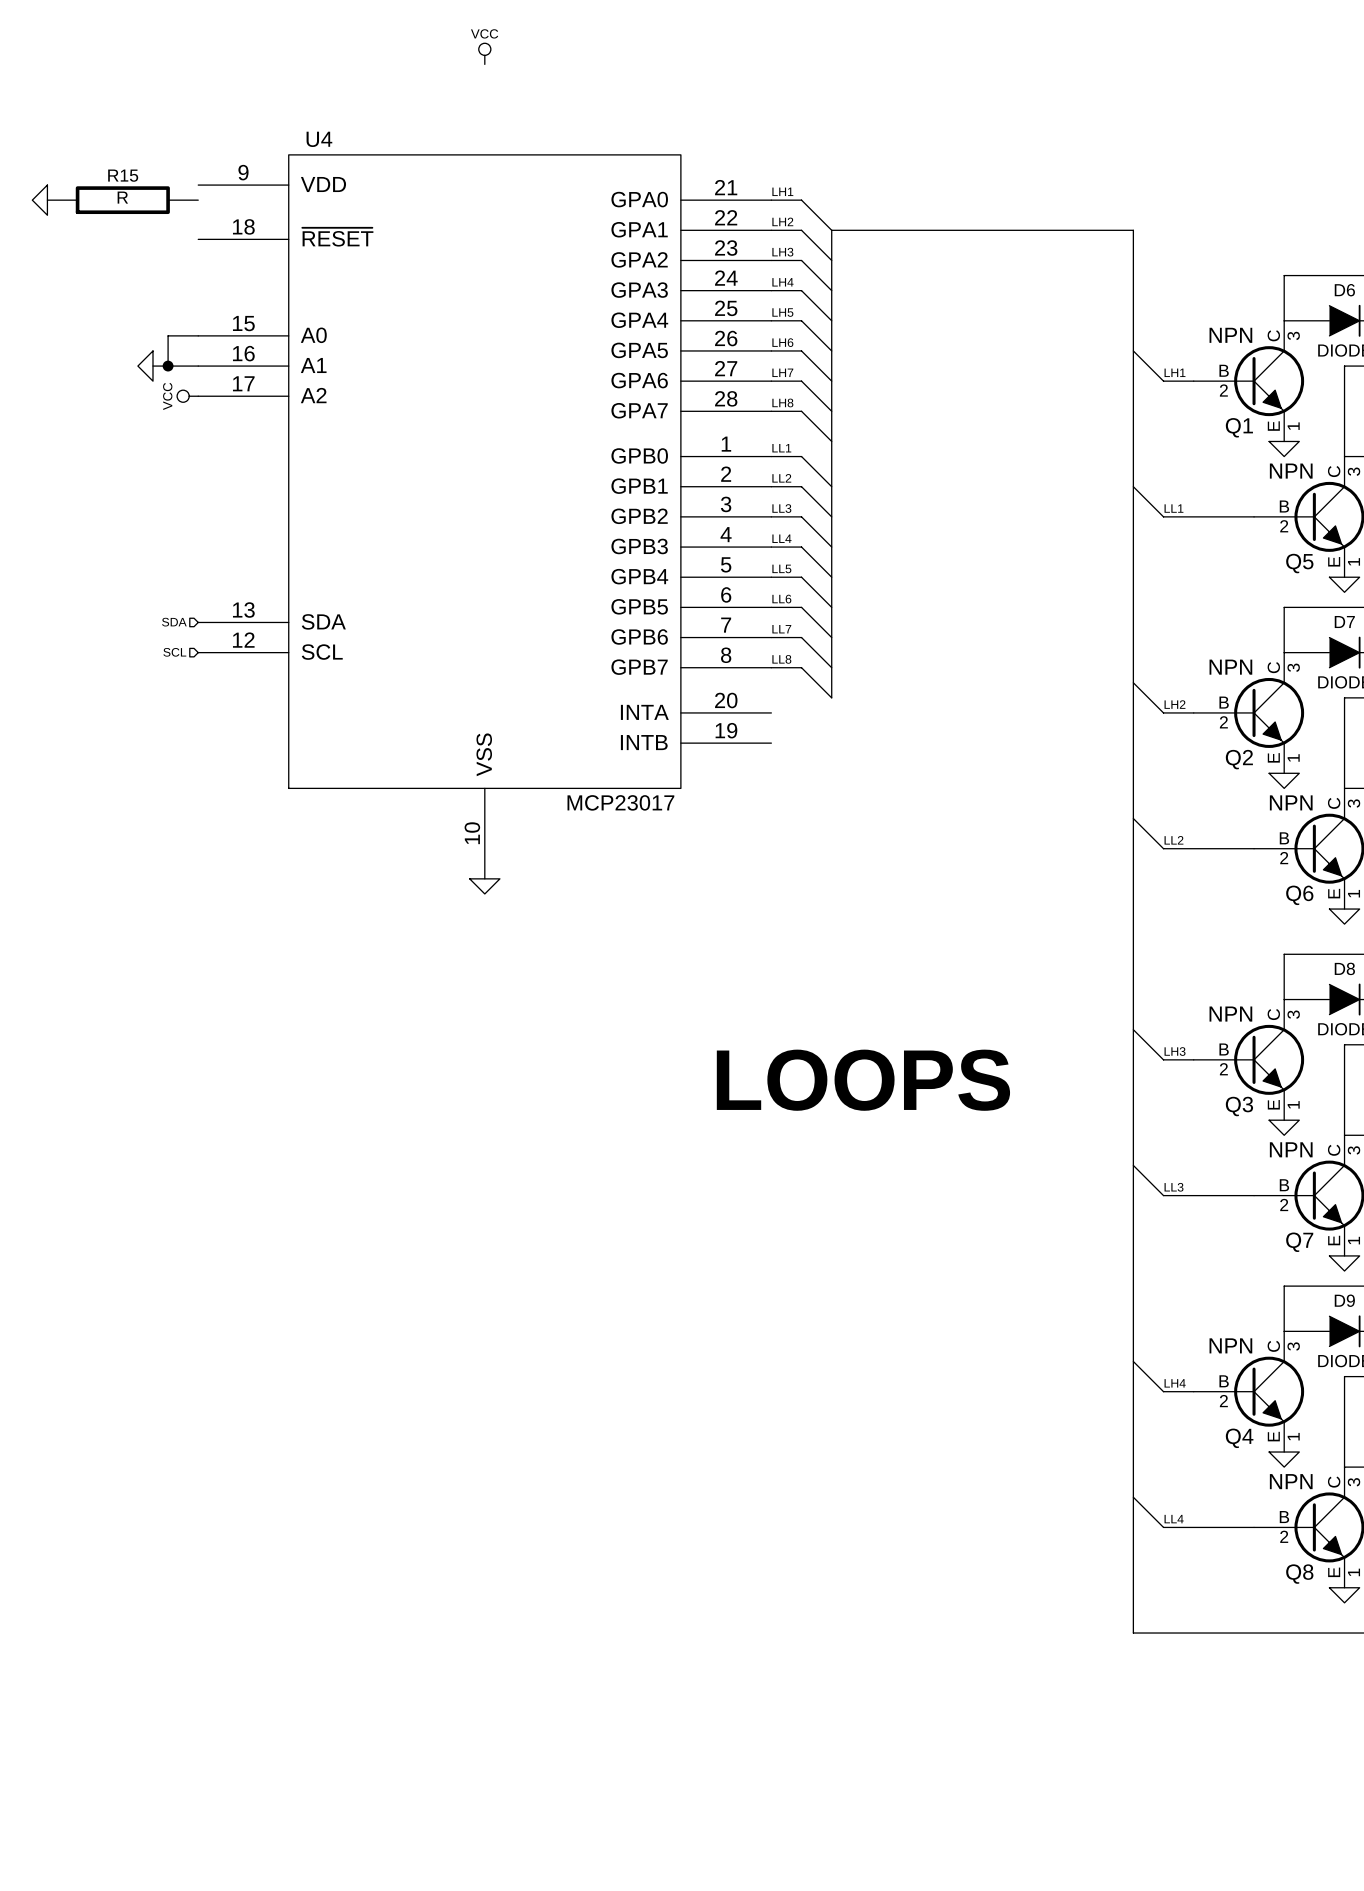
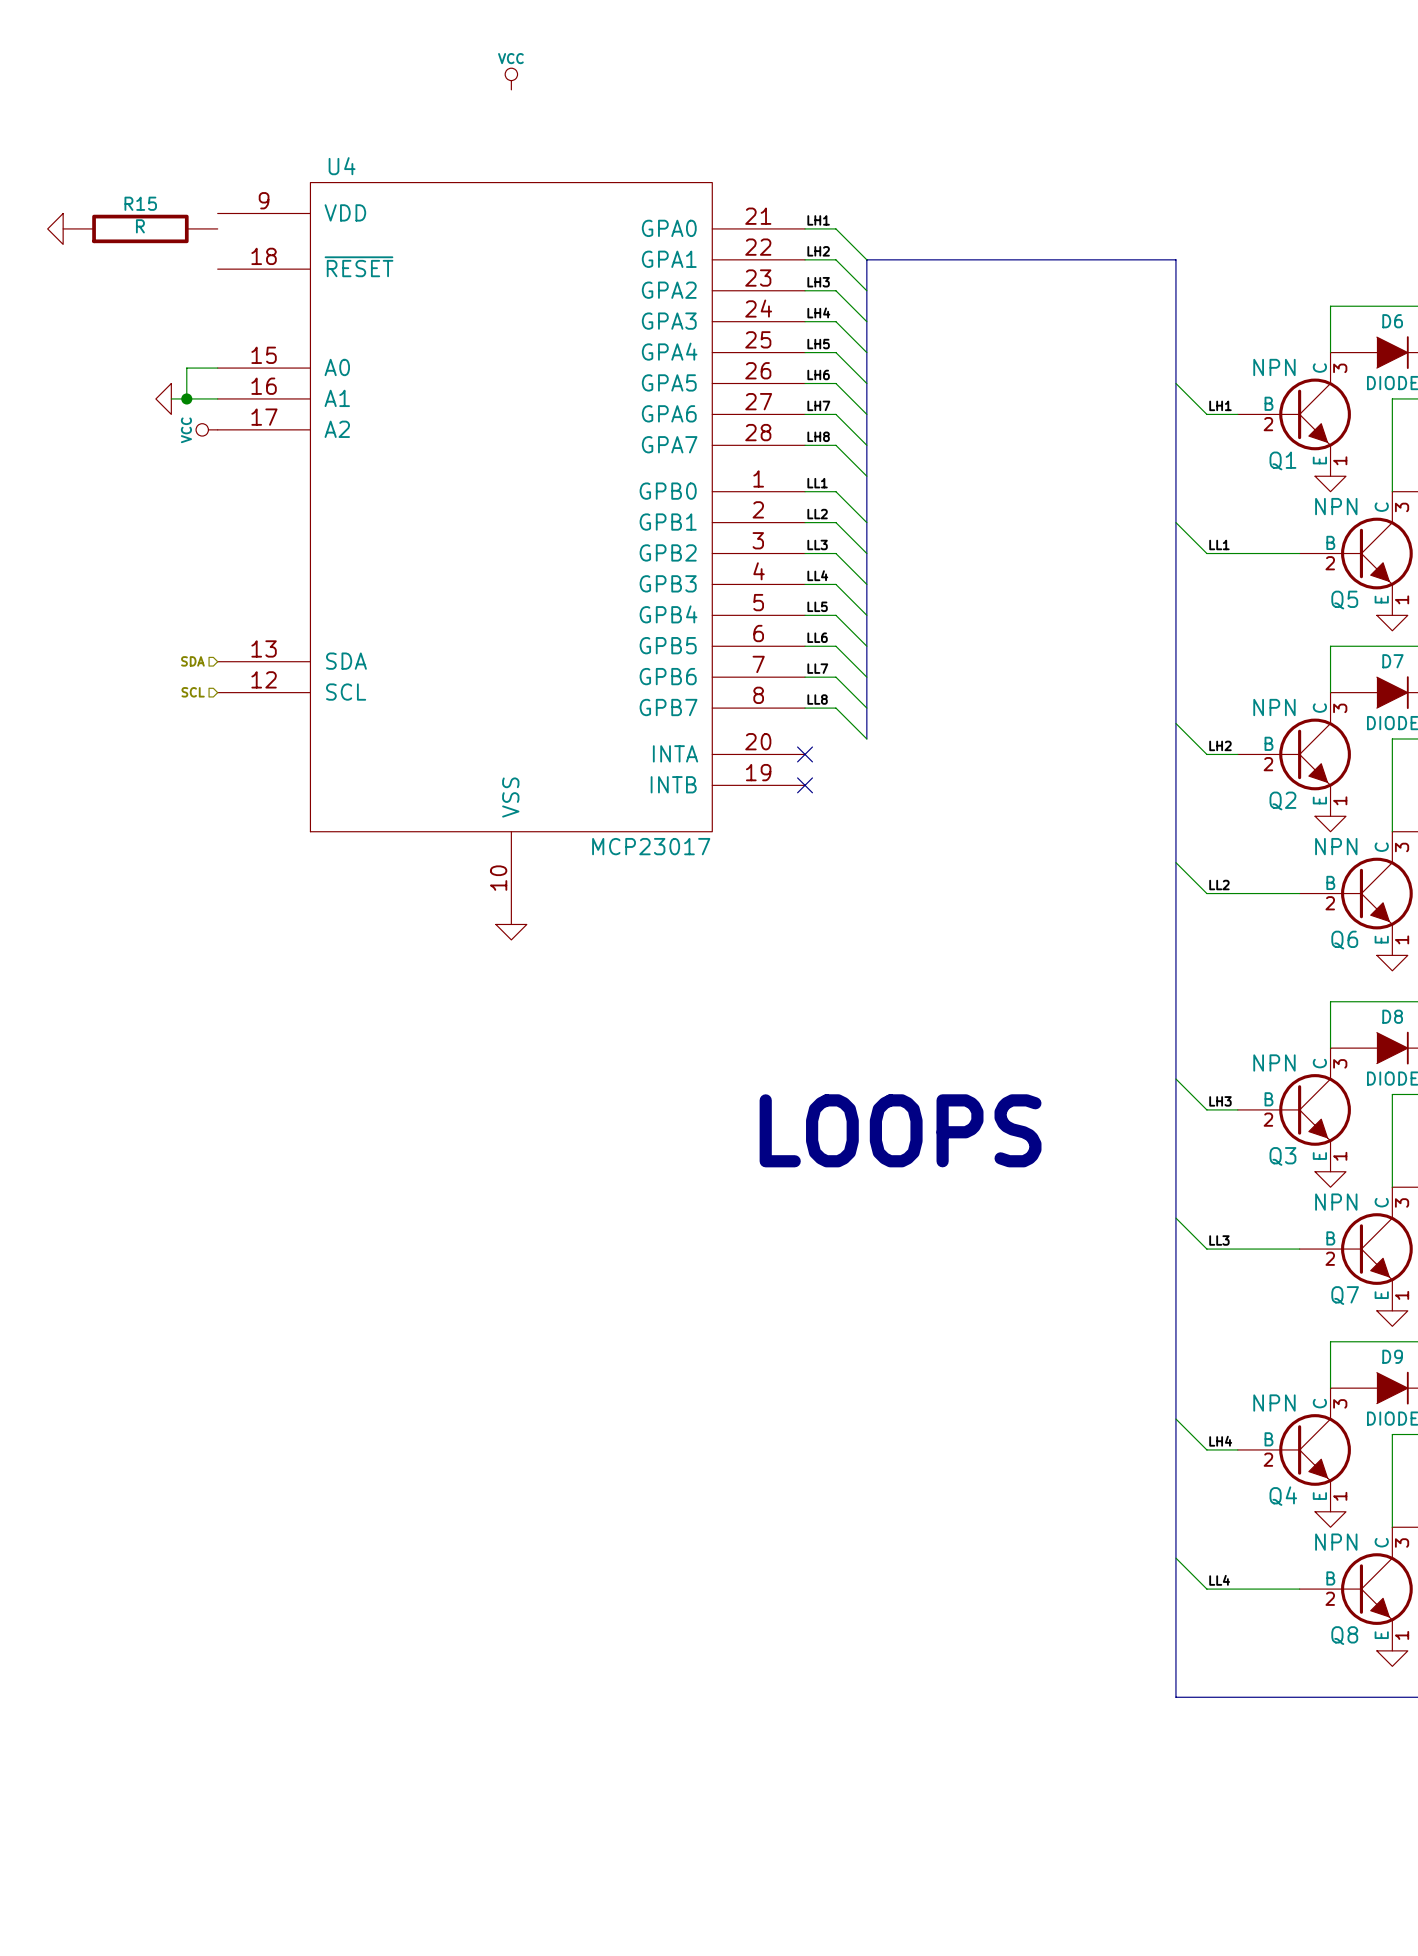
no-connect mark: none -> (805, 754)
no-connect mark: none -> (805, 785)

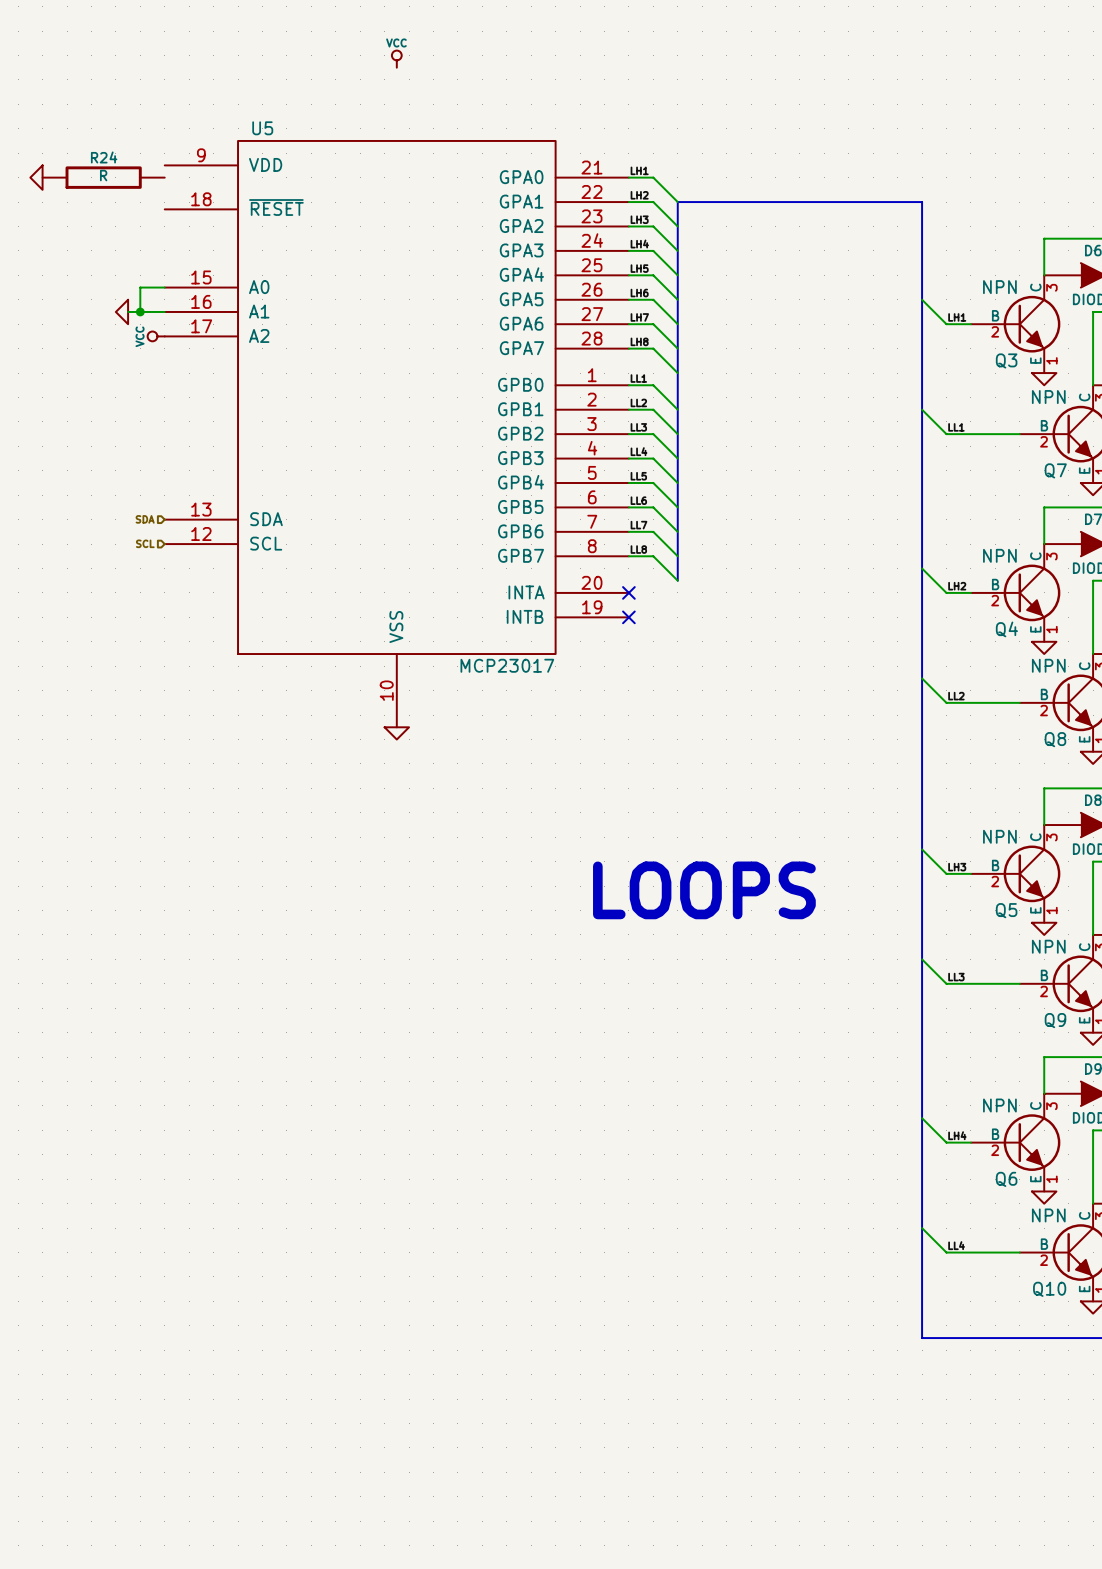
U4 name: U4 (342, 166) -> U5 (262, 128)
R15 name: R15 (140, 203) -> R24 (104, 157)
Q1 name: Q1 (1282, 460) -> Q3 (1006, 360)
Q5 name: Q5 (1344, 600) -> Q7 (1055, 470)
Q2 name: Q2 (1282, 800) -> Q4 (1006, 629)
Q6 name: Q6 (1344, 940) -> Q8 (1055, 739)
Q3 name: Q3 (1282, 1156) -> Q5 (1006, 910)
Q7 name: Q7 (1345, 1295) -> Q9 (1055, 1020)
Q4 name: Q4 (1283, 1496) -> Q6 (1006, 1179)
Q8 name: Q8 (1344, 1635) -> Q10 (1049, 1289)

